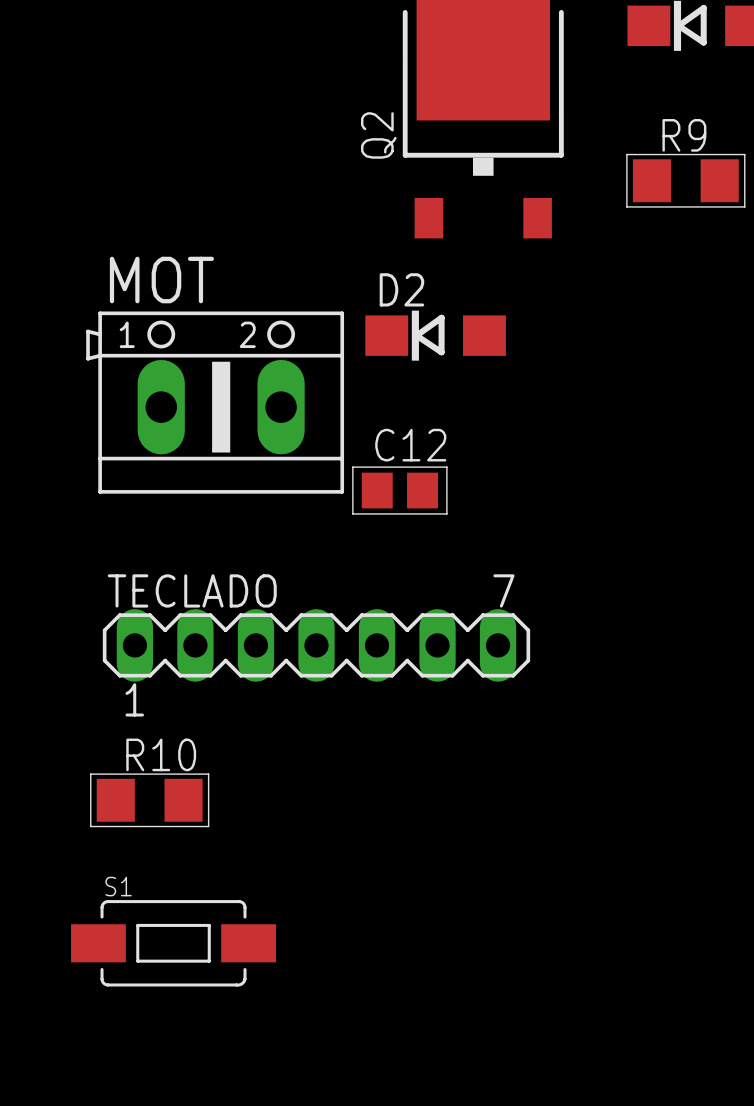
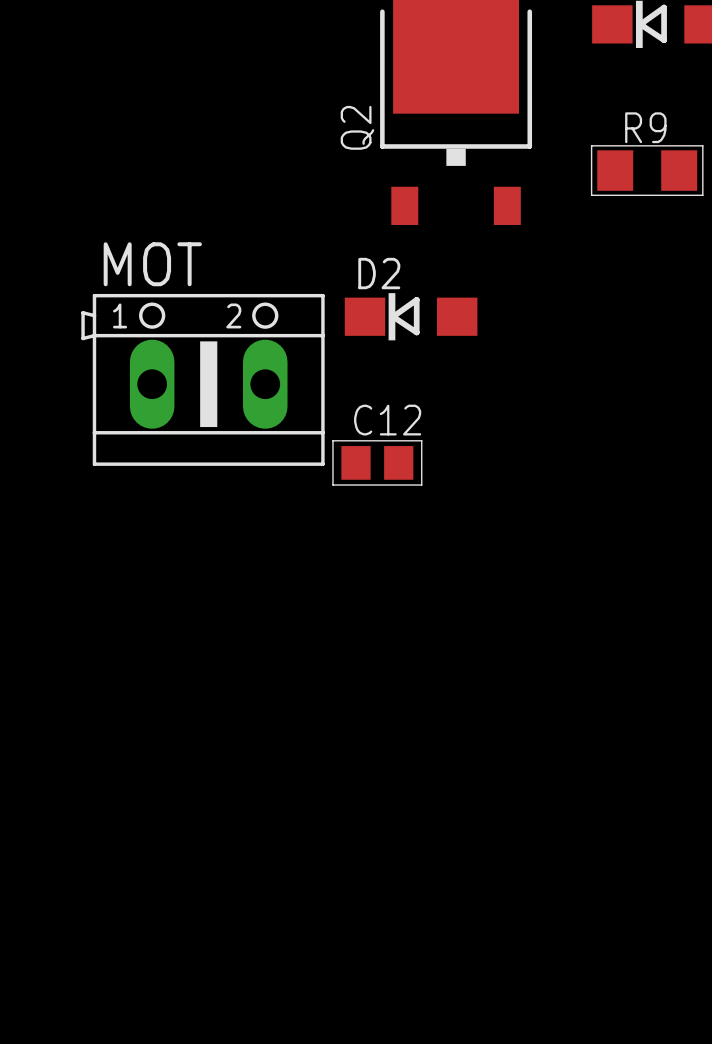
TECLADO: (316, 645) -> none
R10: (149, 800) -> none
S1: (173, 943) -> none

